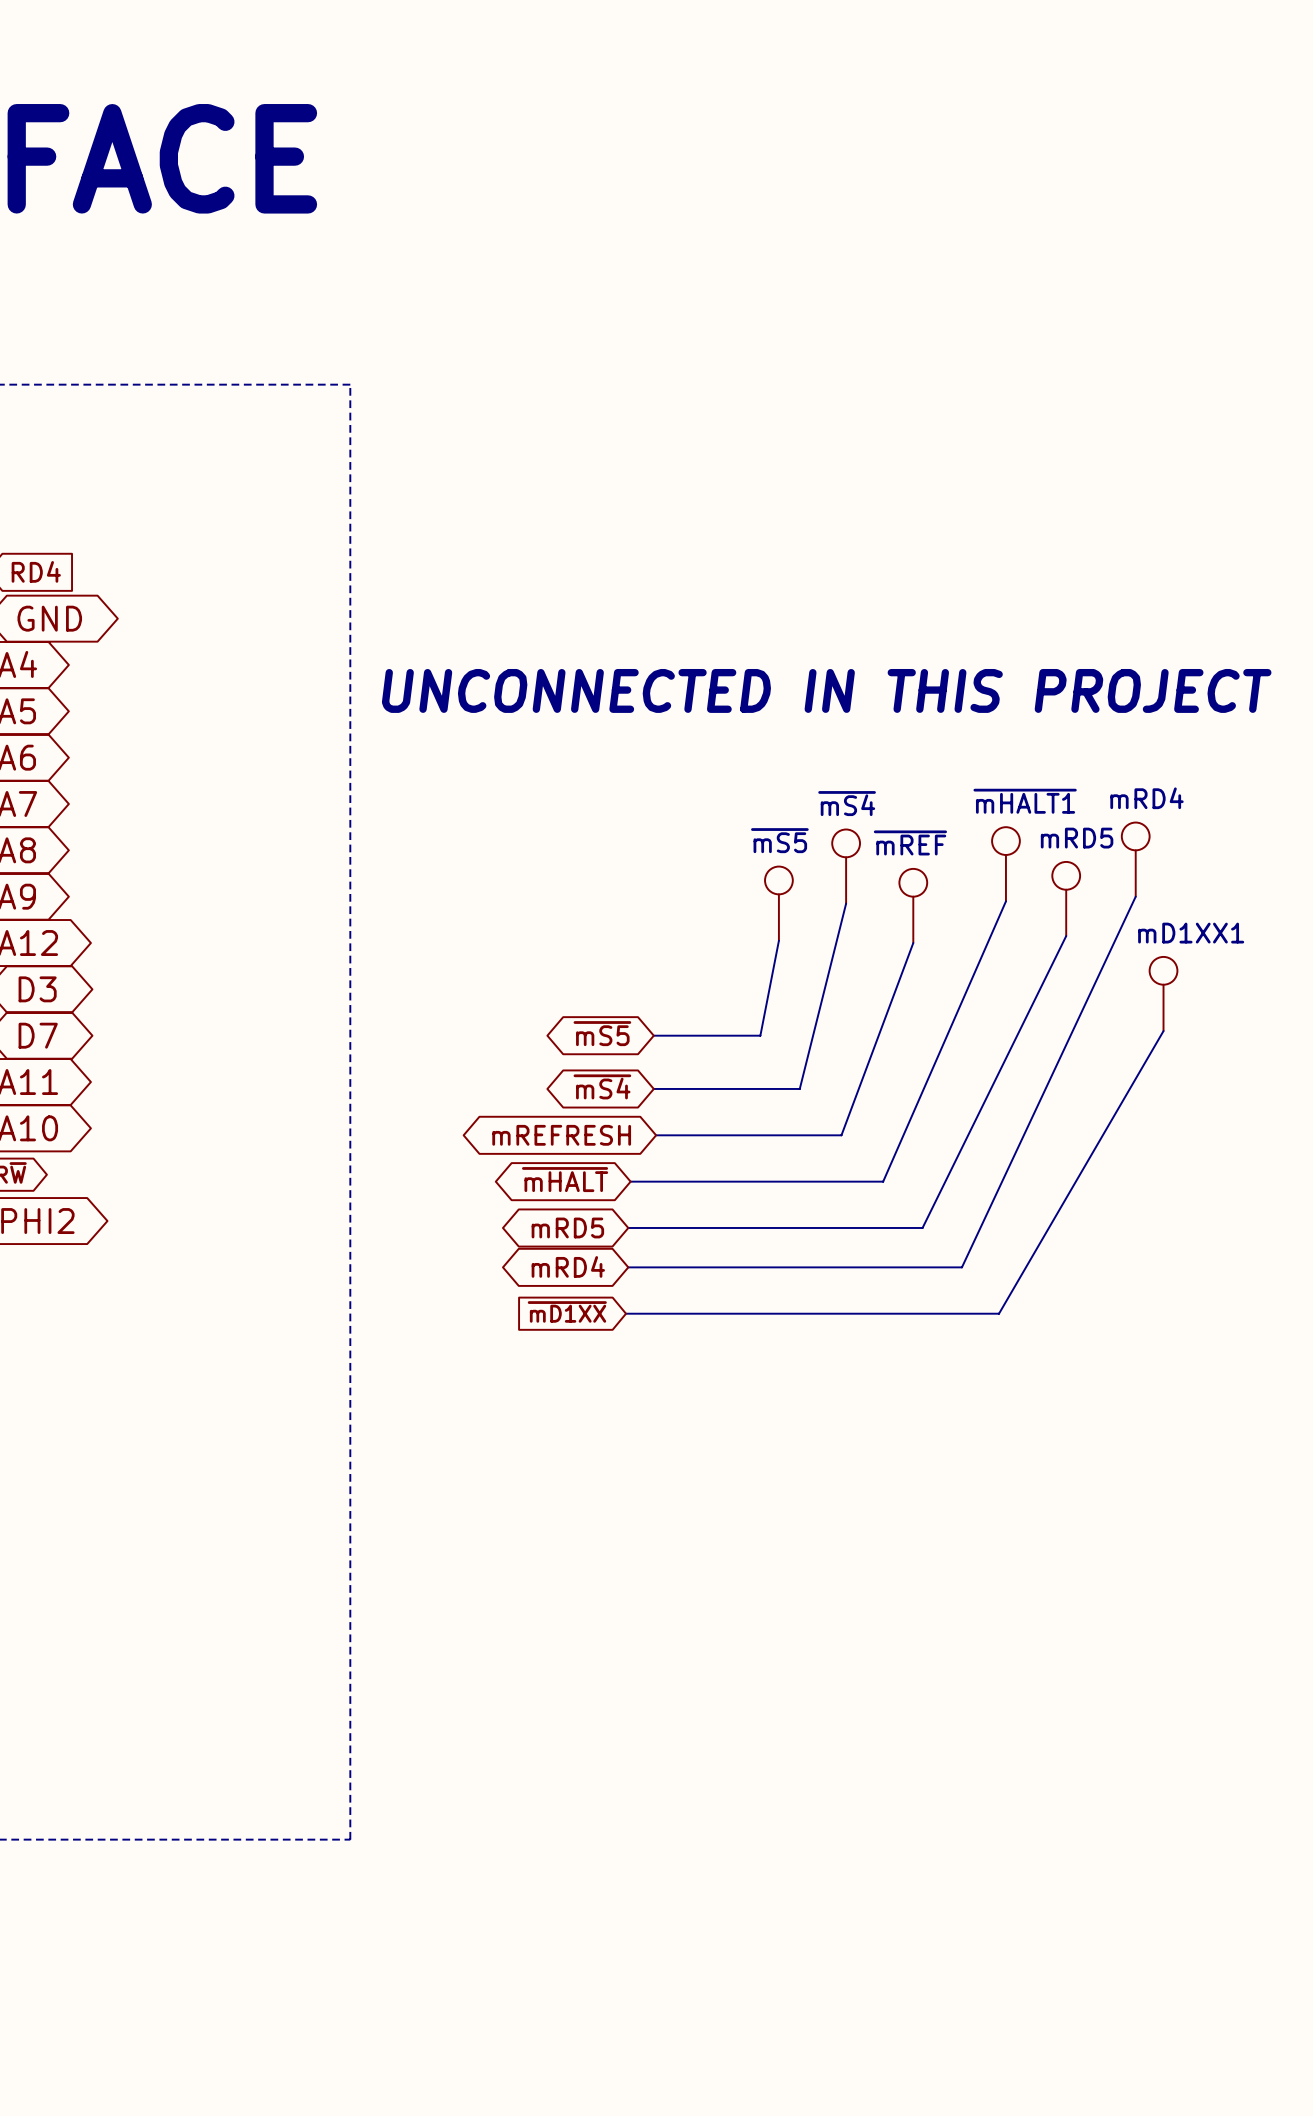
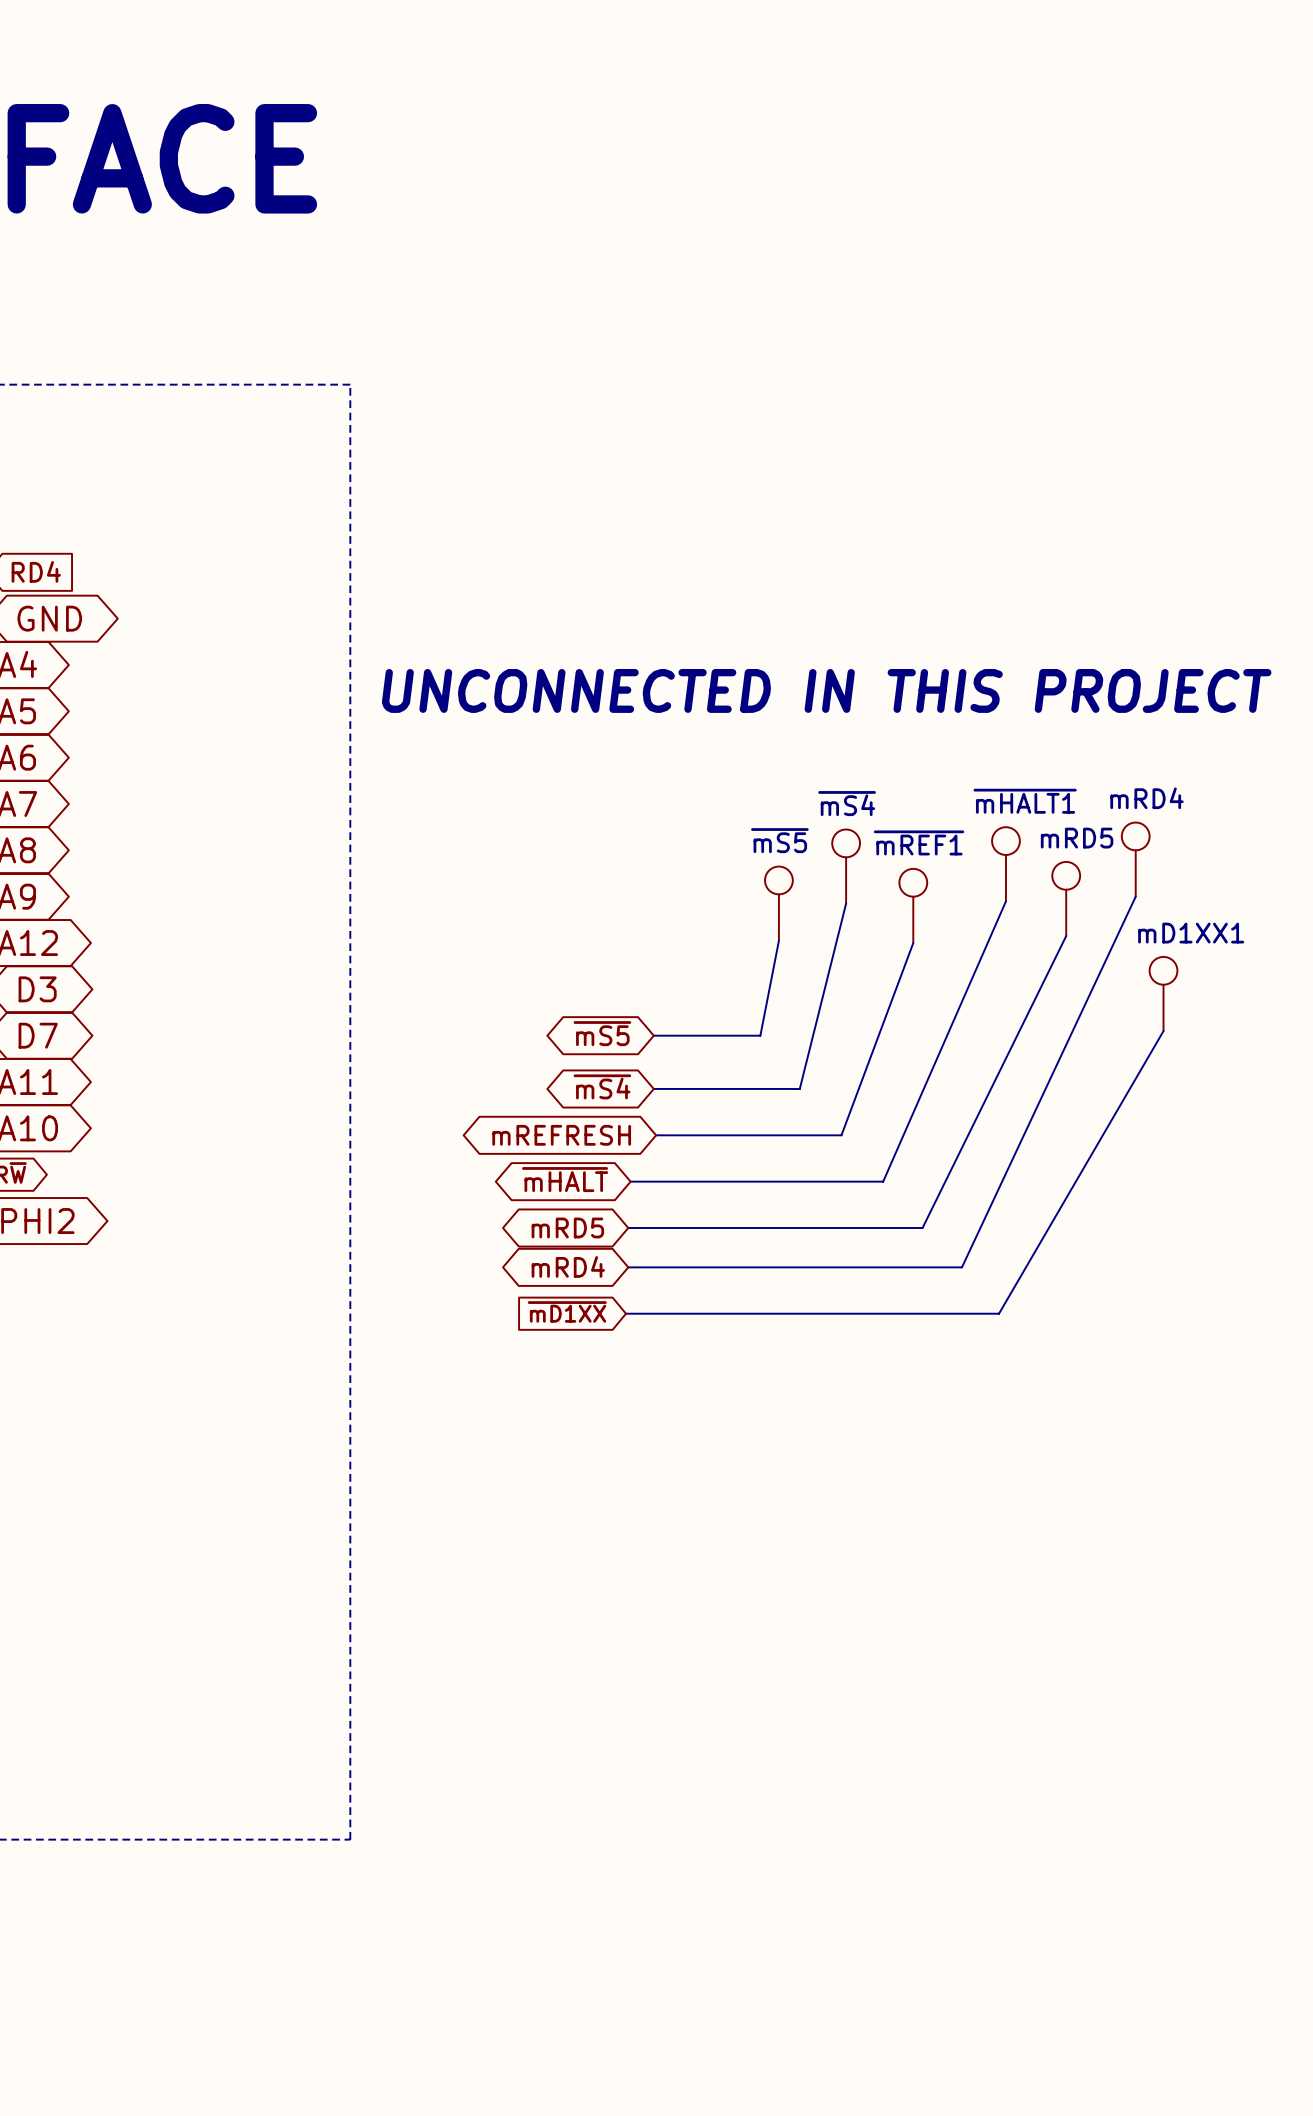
~{mREF} name: ~{mREF} (910, 842) -> ~{mREF1} (919, 842)

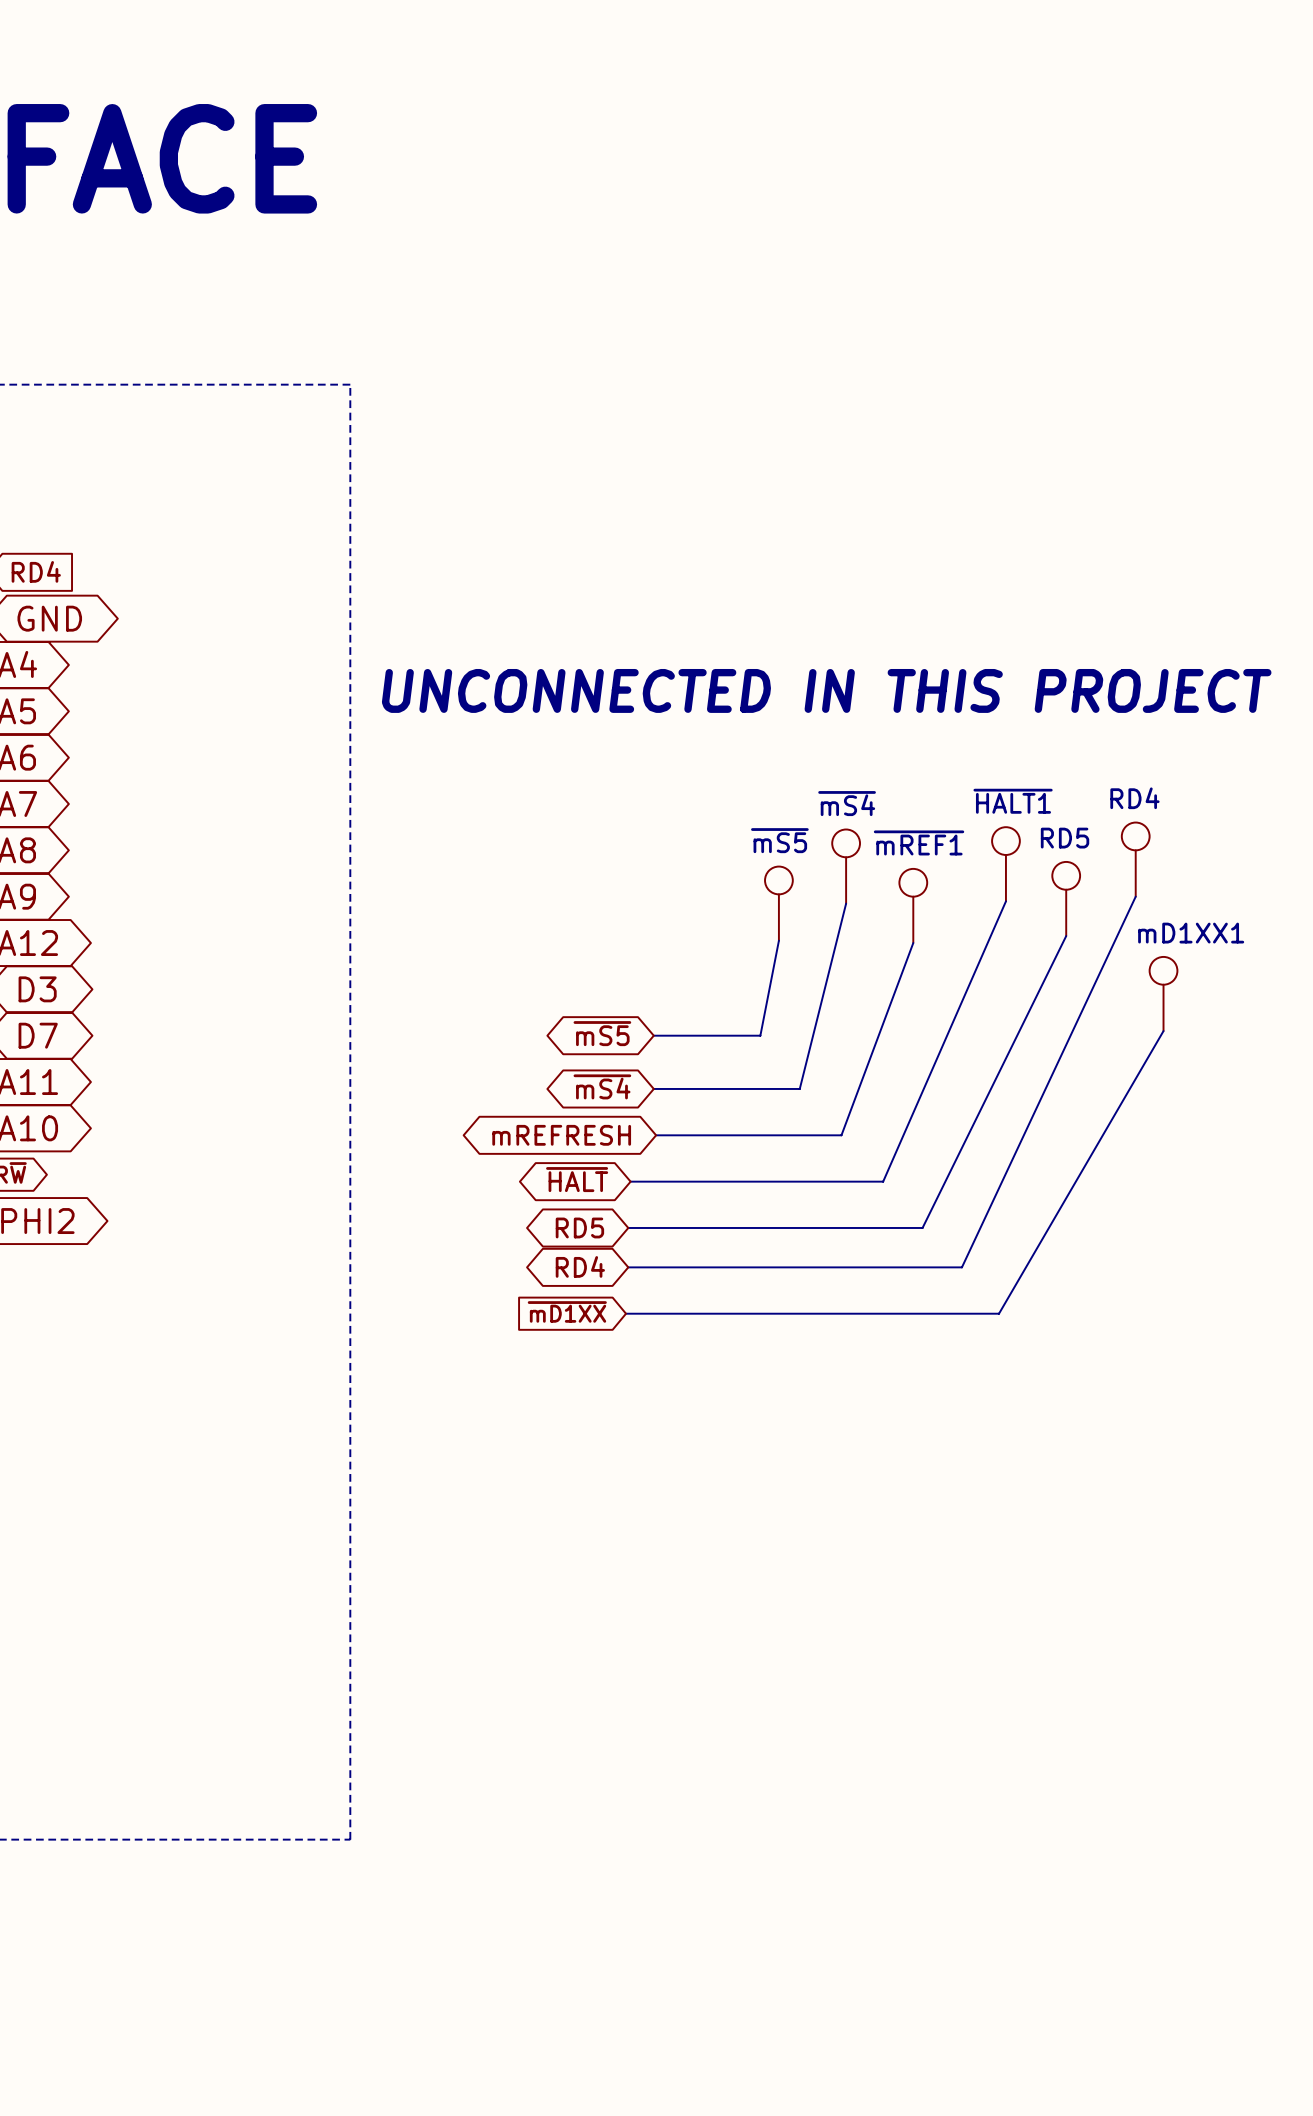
mRD4 name: mRD4 (1147, 798) -> RD4 (1134, 798)
~{mHALT1} name: ~{mHALT1} (1025, 801) -> ~{HALT1} (1013, 801)
mRD5 name: mRD5 (1077, 838) -> RD5 (1065, 838)
global label: ~{mHALT} (565, 1179) -> ~{HALT} (577, 1179)
global label: mRD5 (567, 1227) -> RD5 (579, 1227)
global label: mRD4 (568, 1266) -> RD4 (580, 1266)

